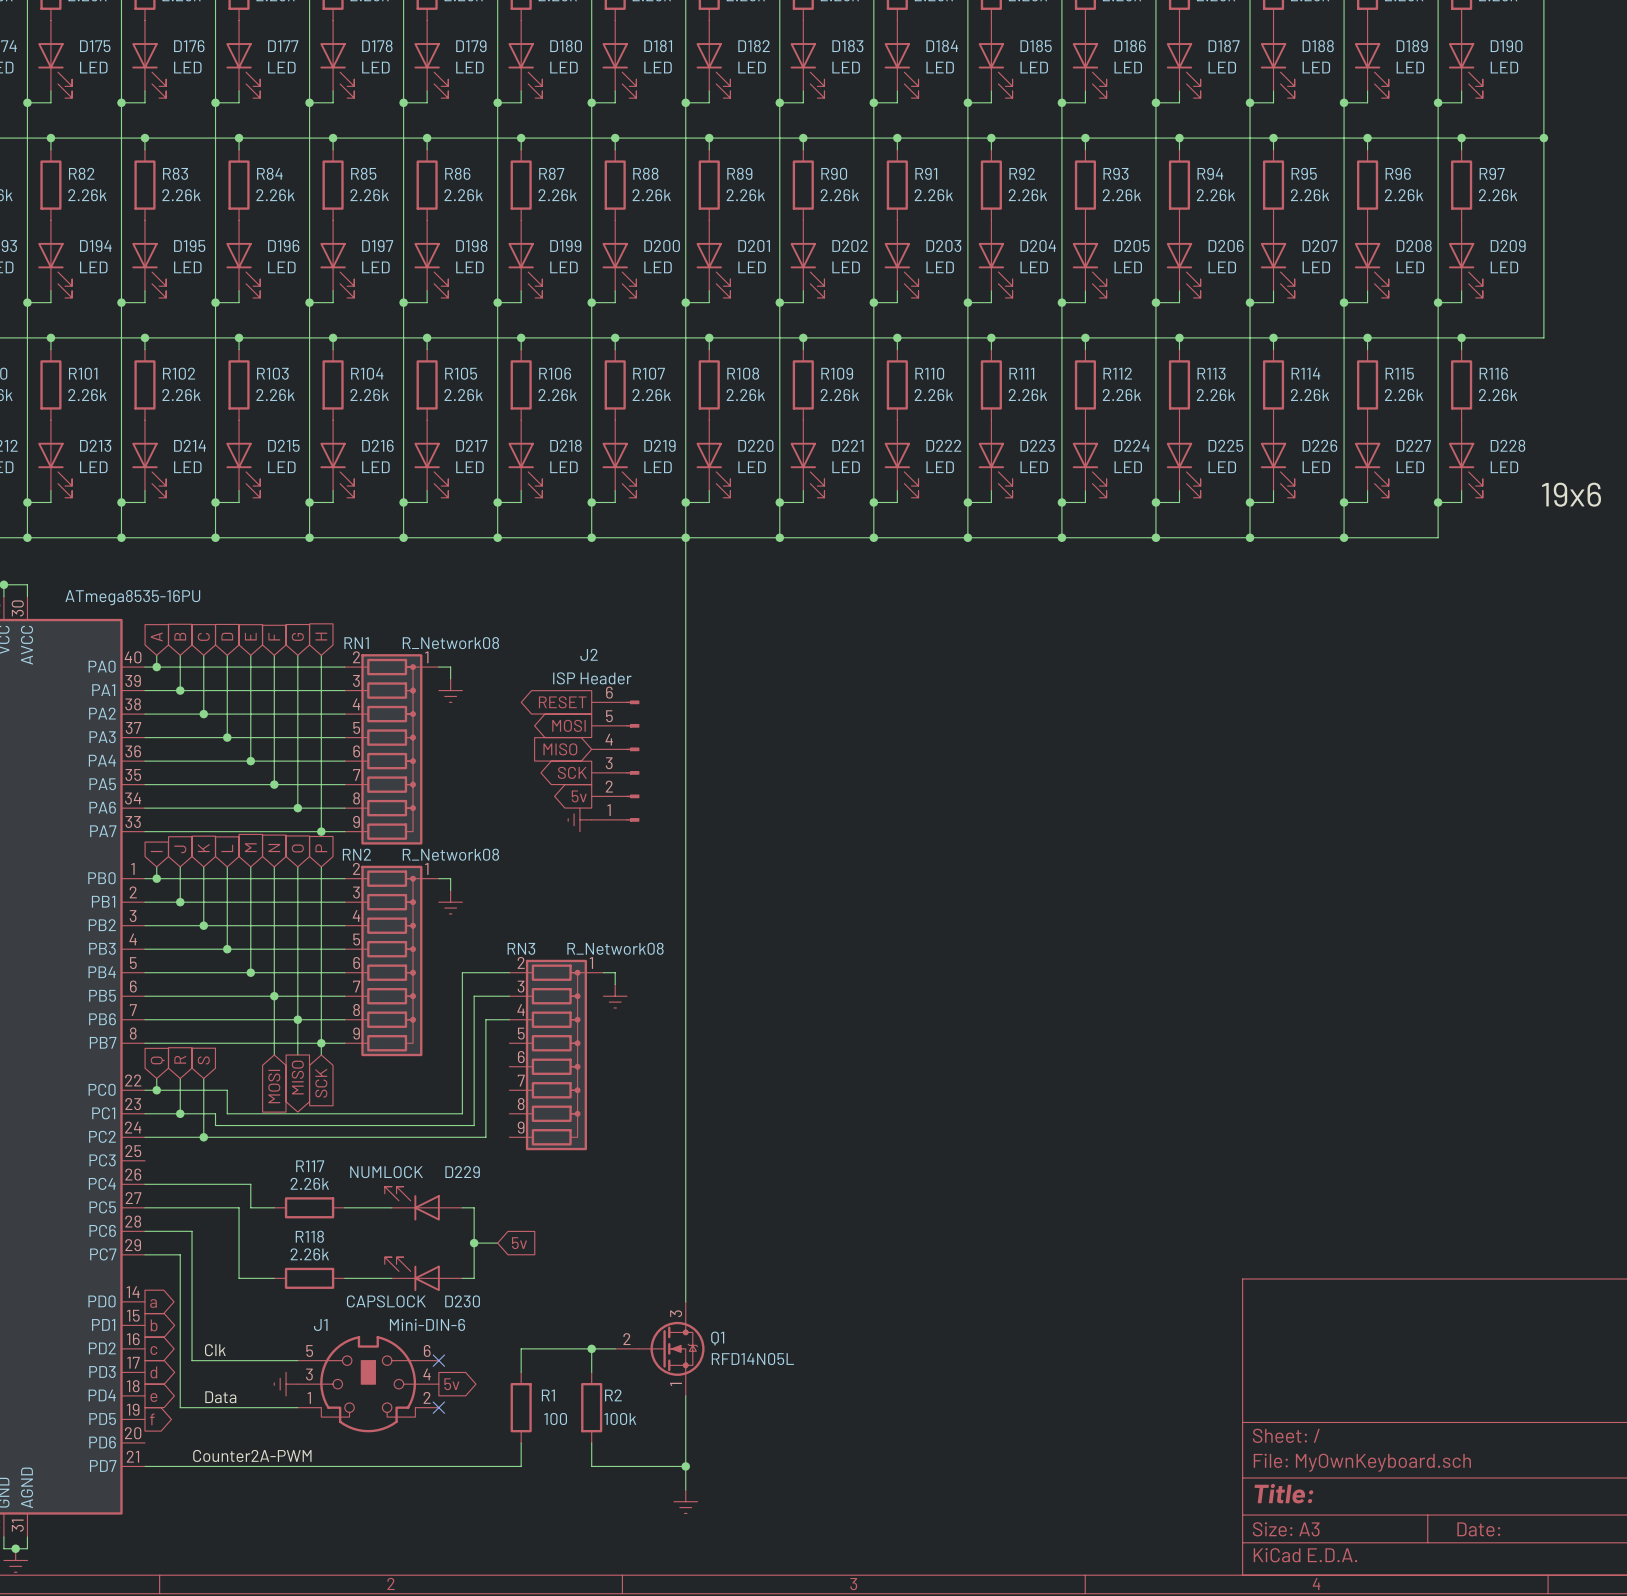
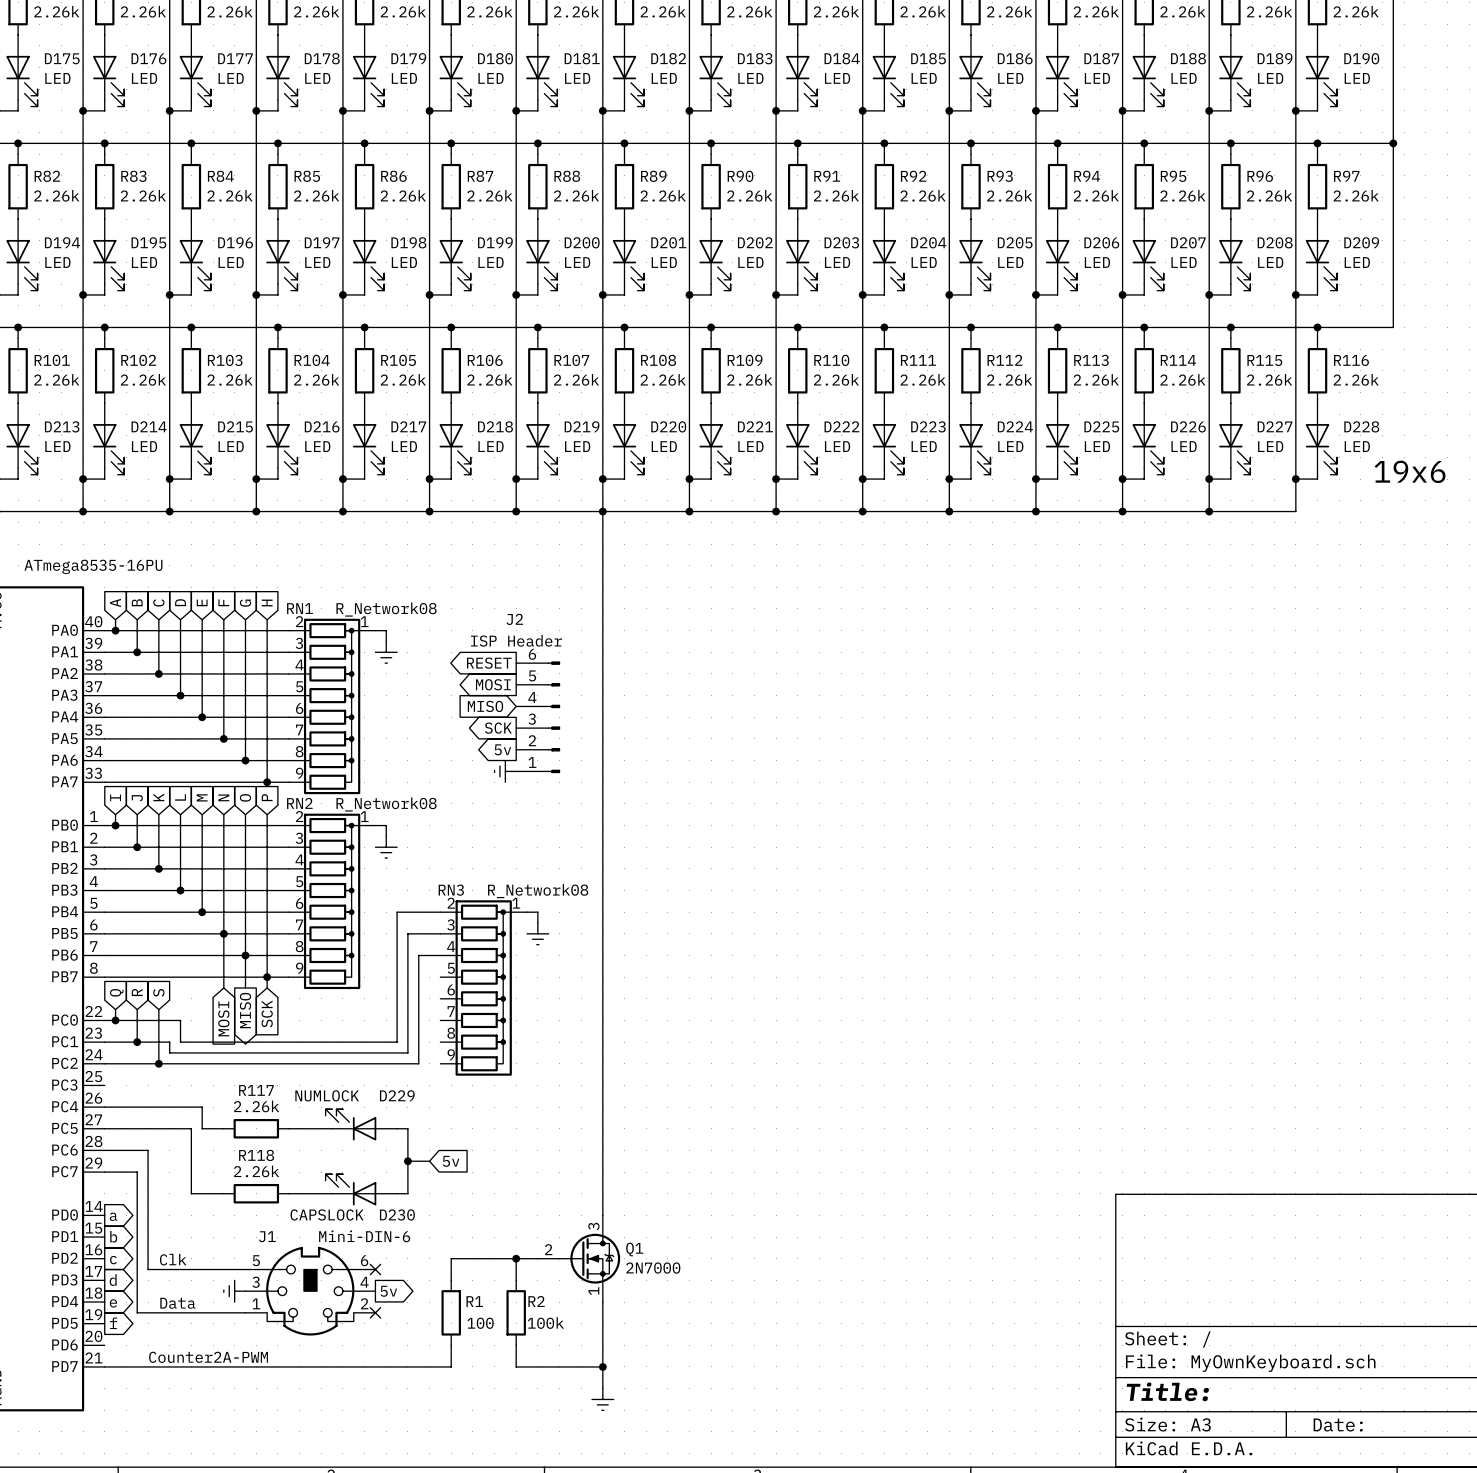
Q1 value: RFD14N05L (752, 1359) -> 2N7000 (653, 1268)

